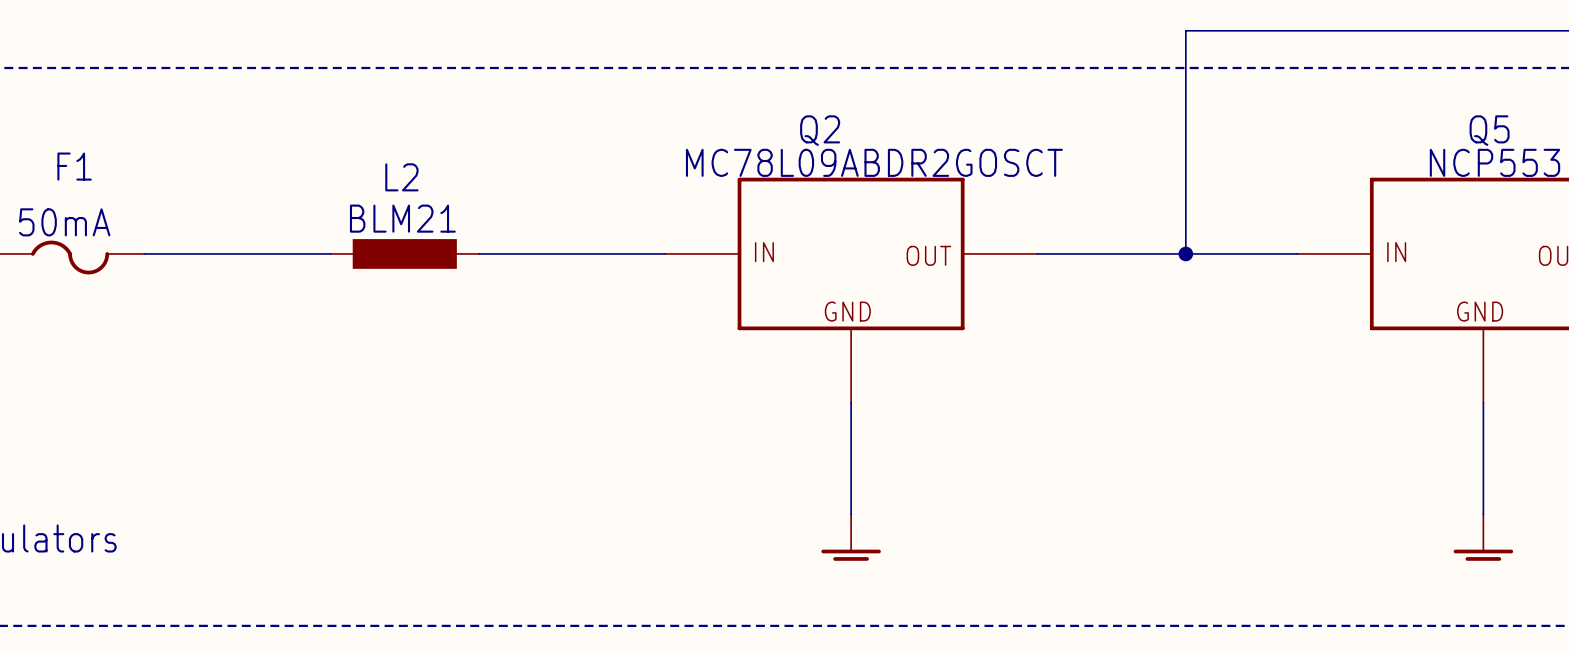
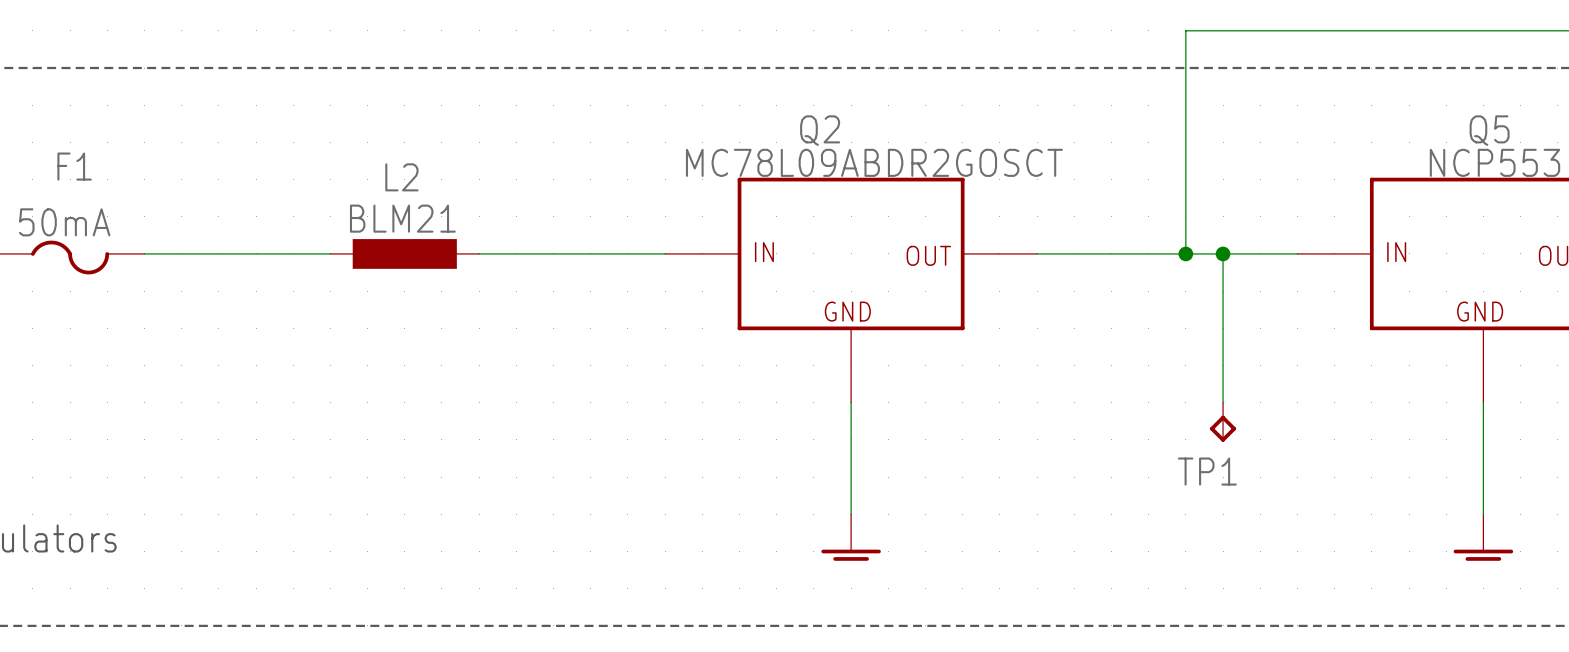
wire: none -> (1223, 253) (1223, 402)
junction: none -> (1223, 253)
TP1: none -> (1223, 422)

